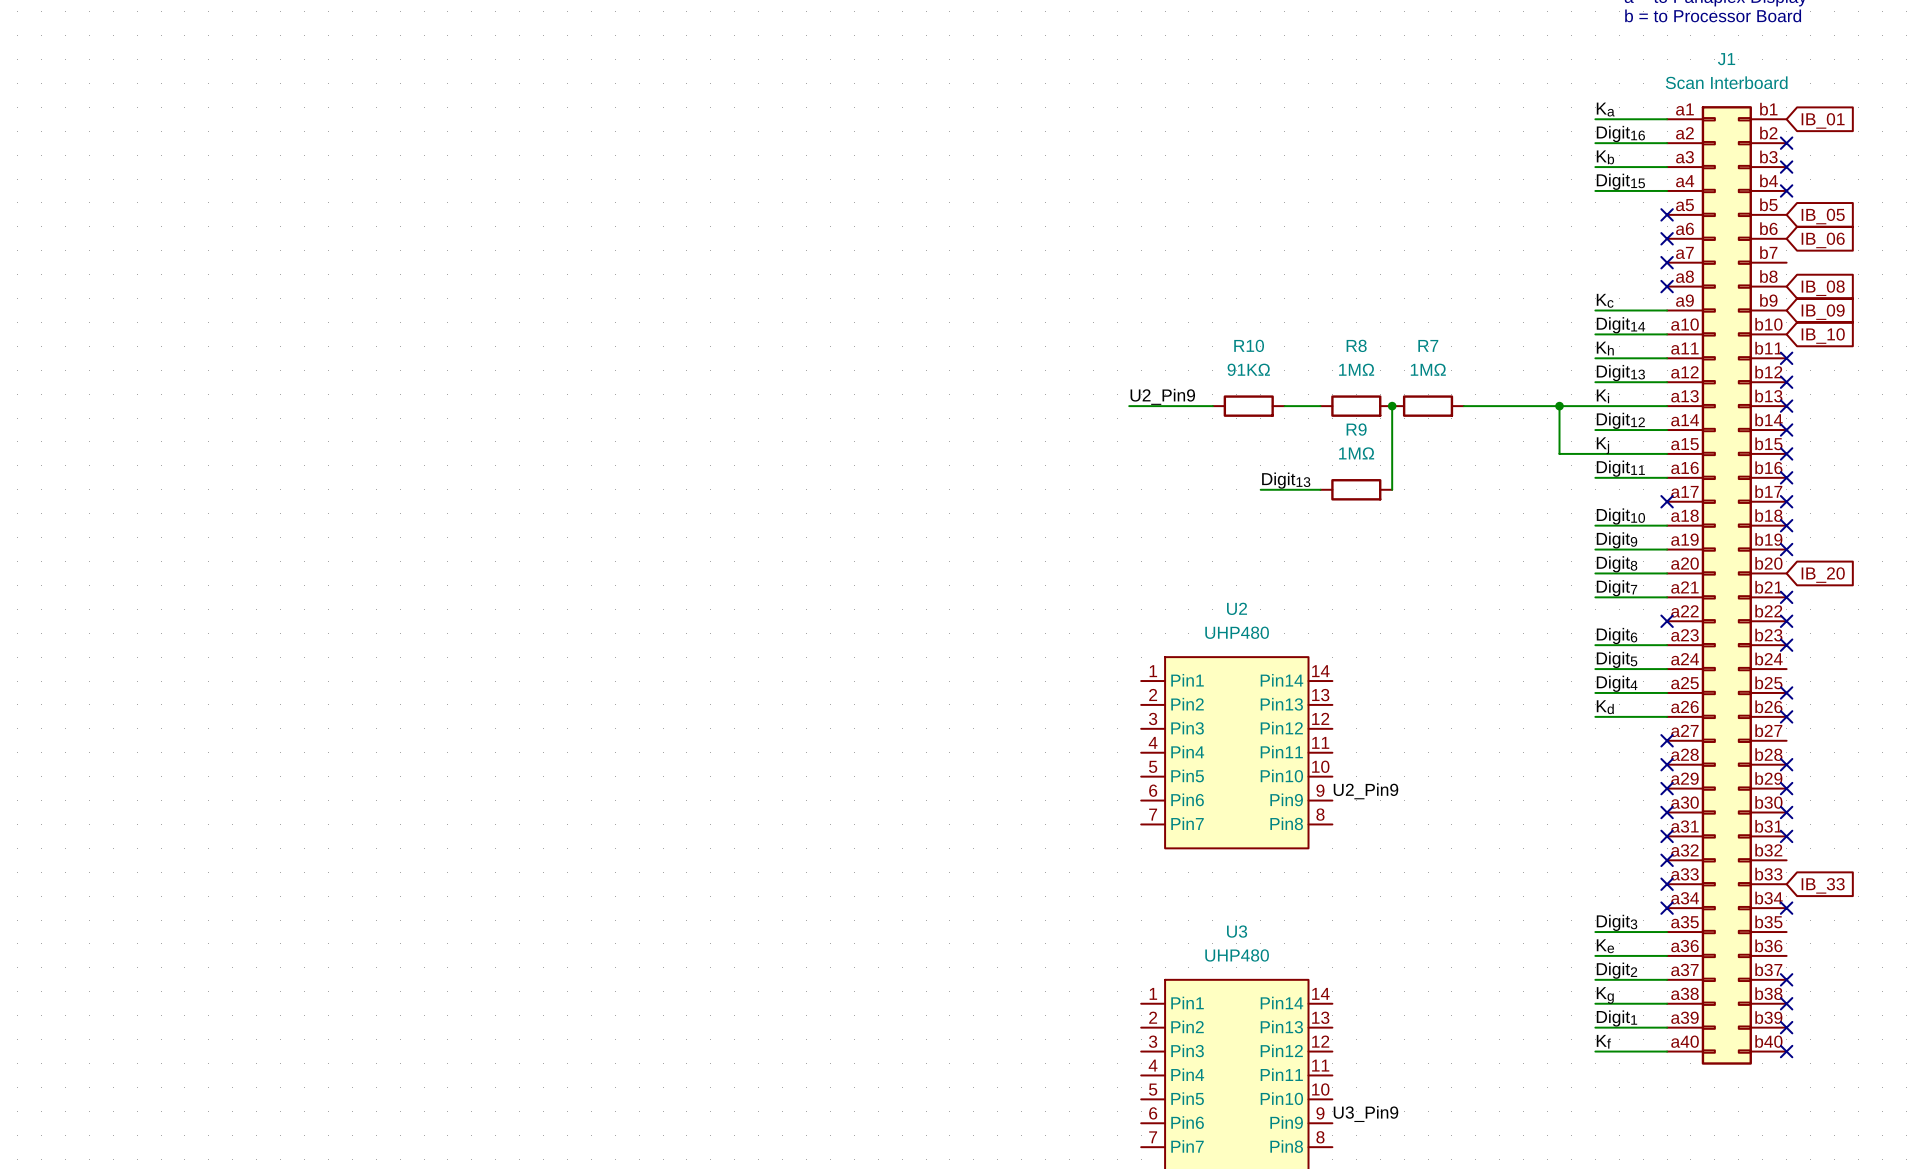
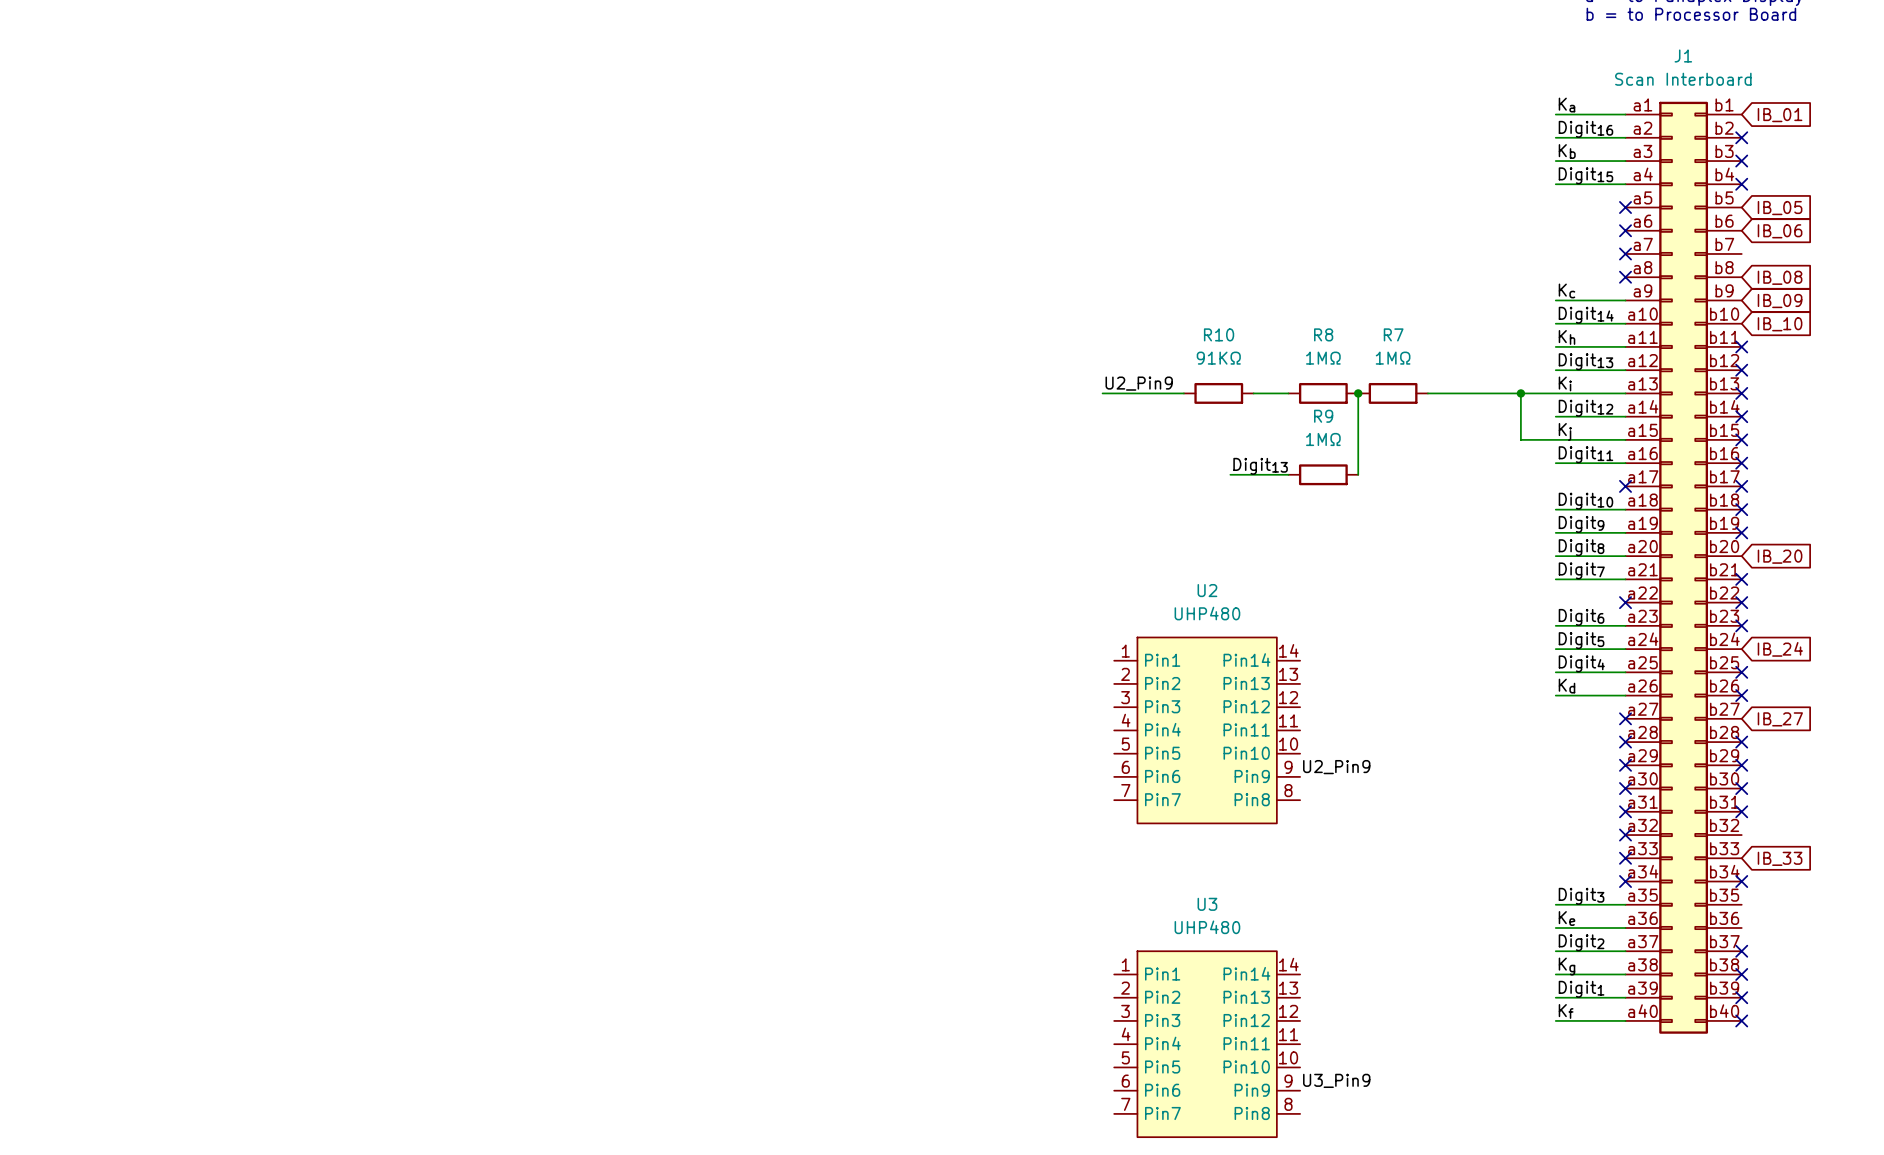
global label: none -> IB_24 (1780, 649)
global label: none -> IB_27 (1780, 719)

